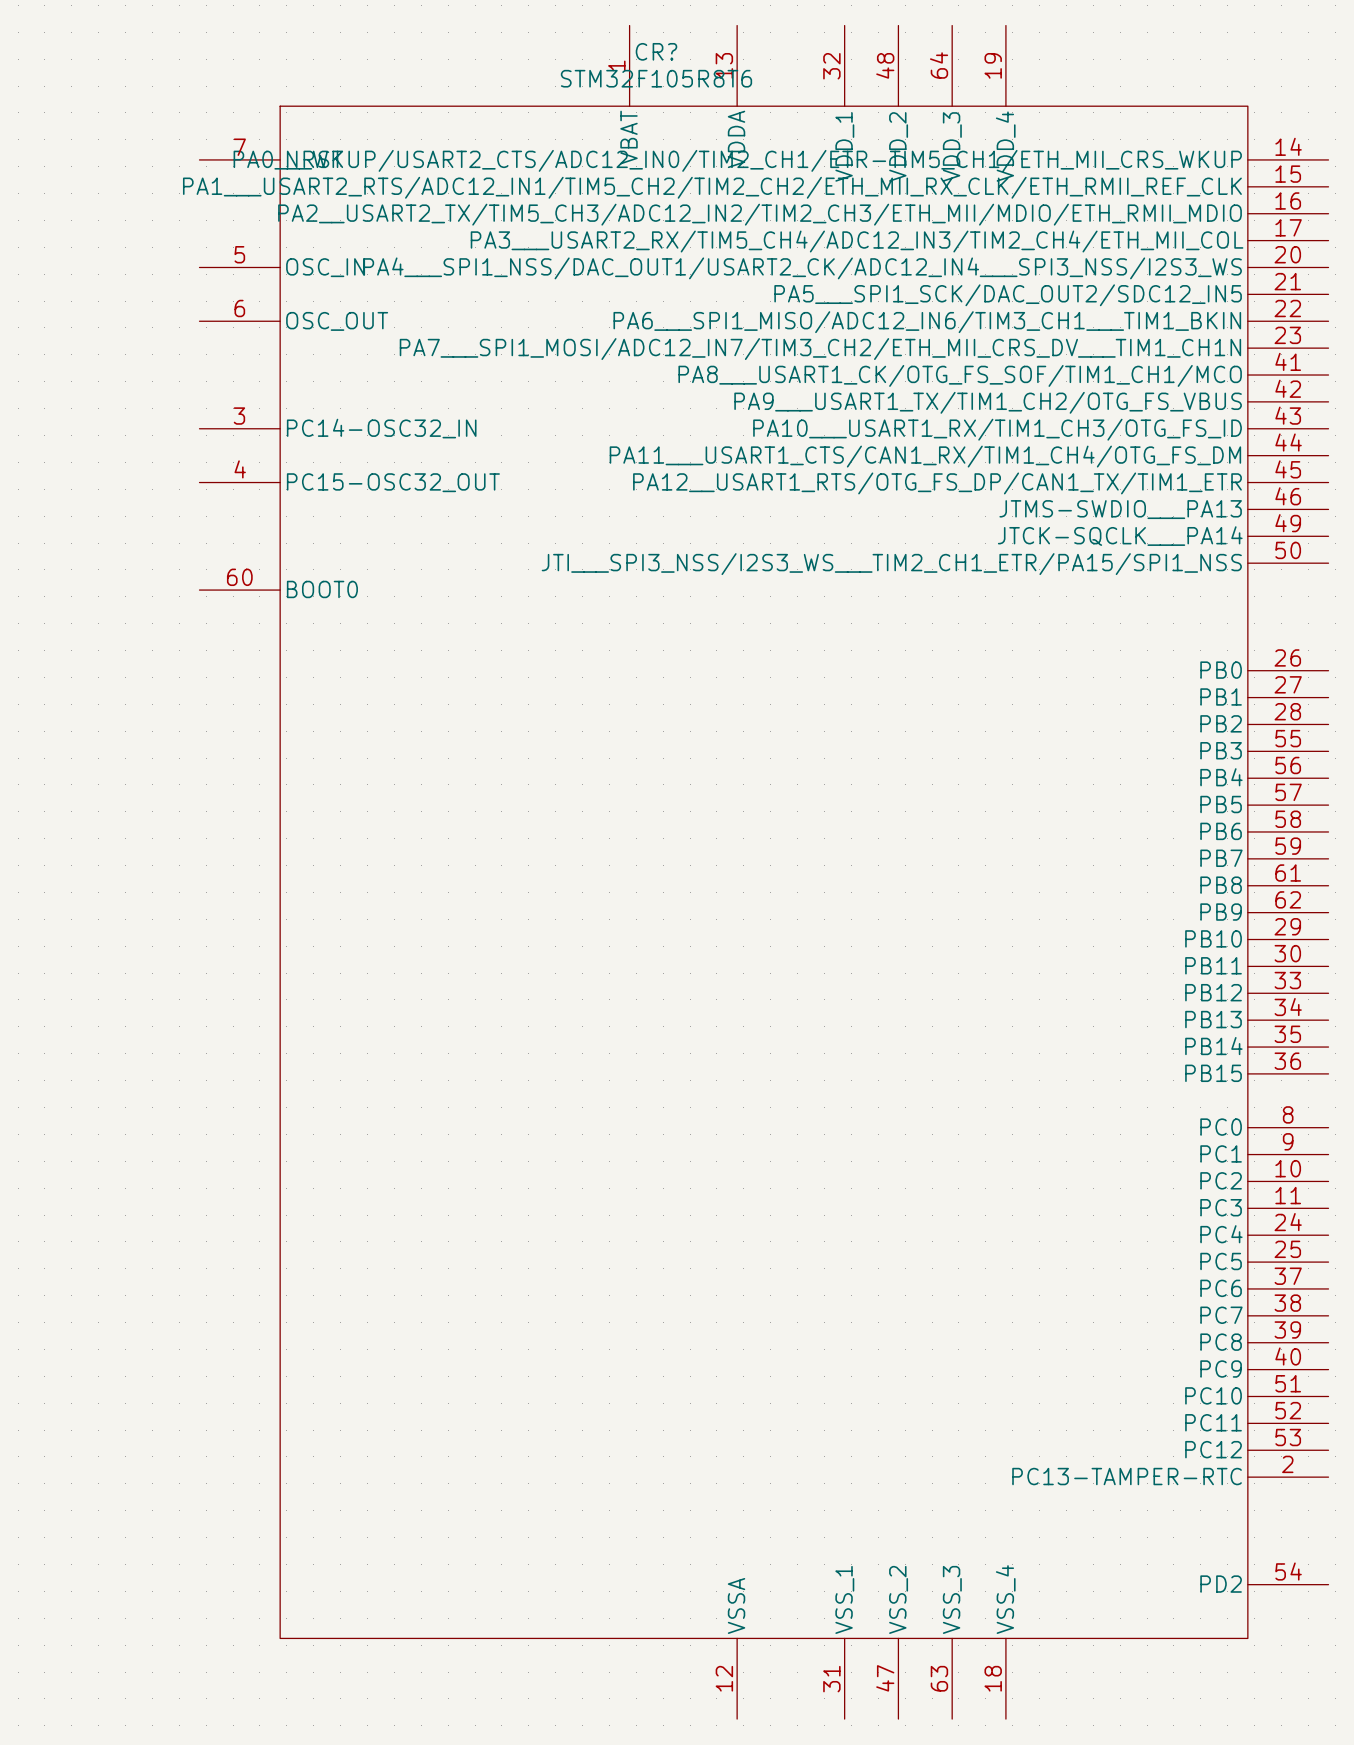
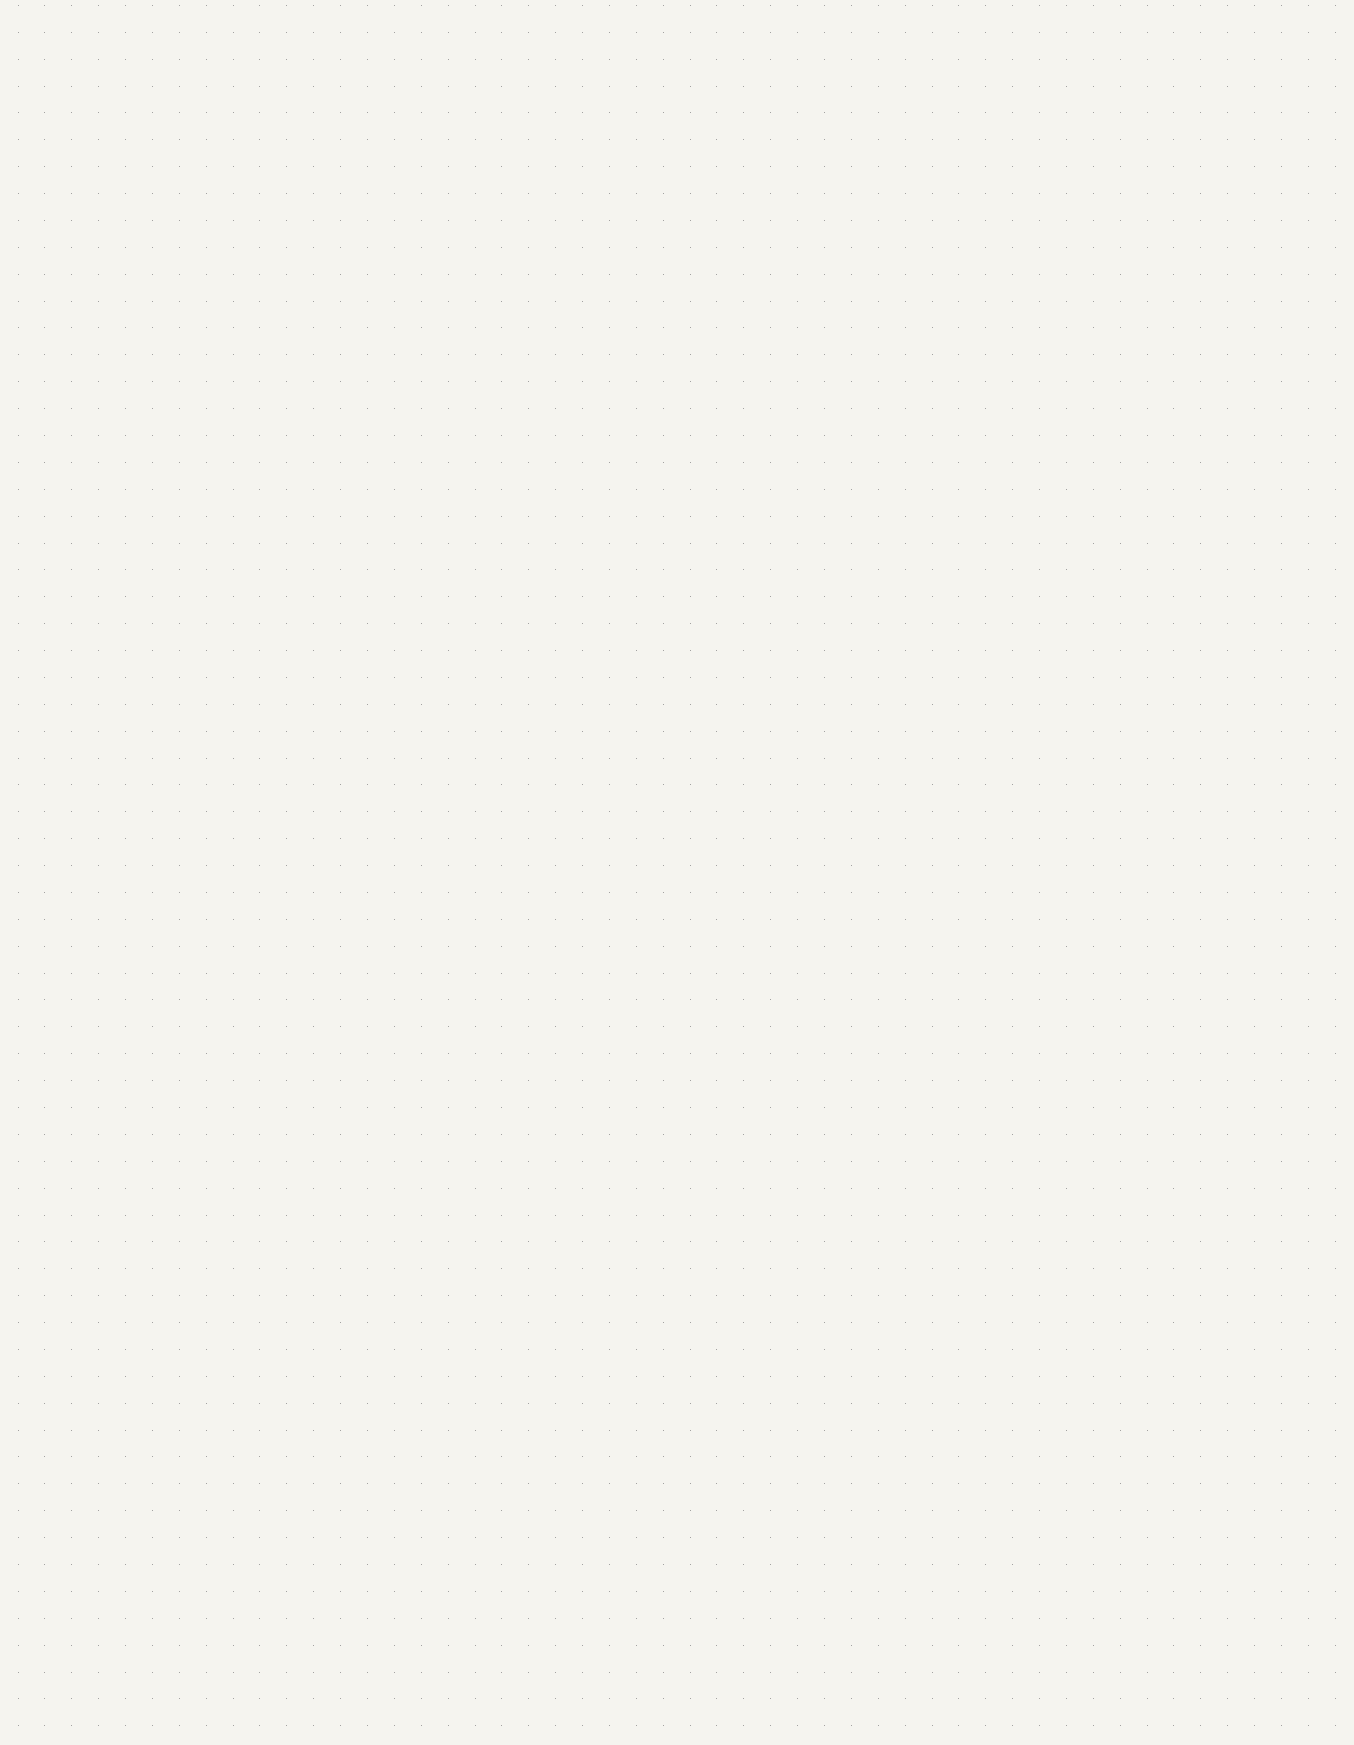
CR?: STM32F105R8T6 (764, 872) -> none

